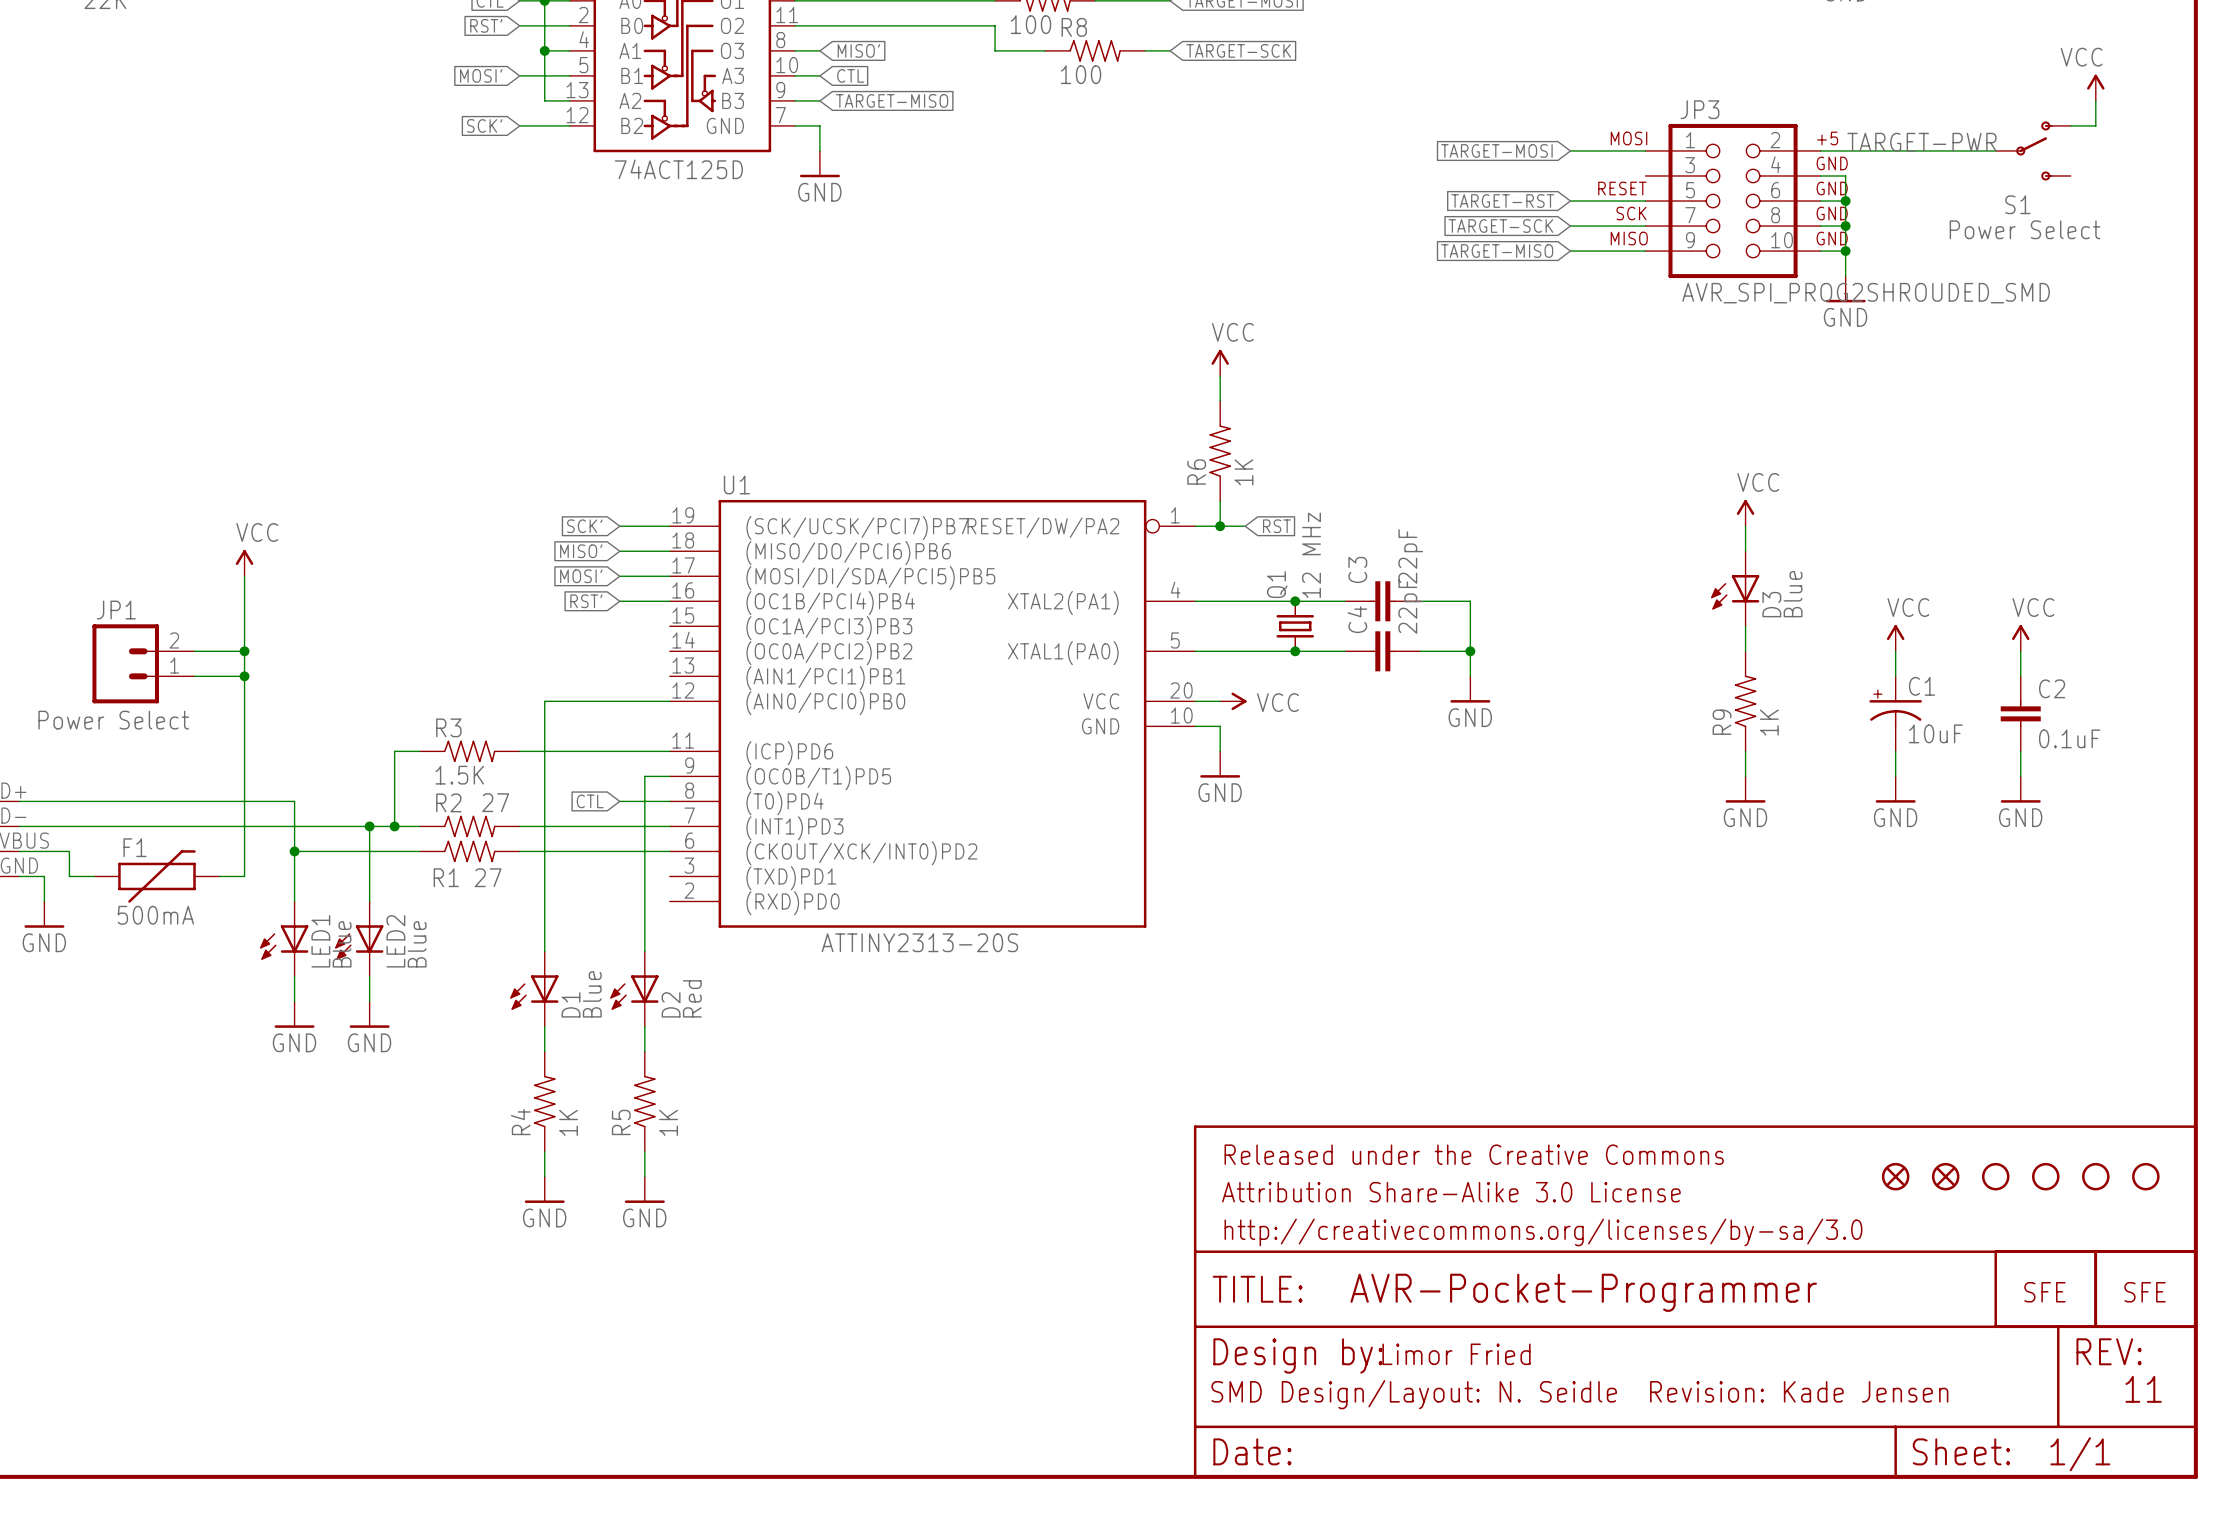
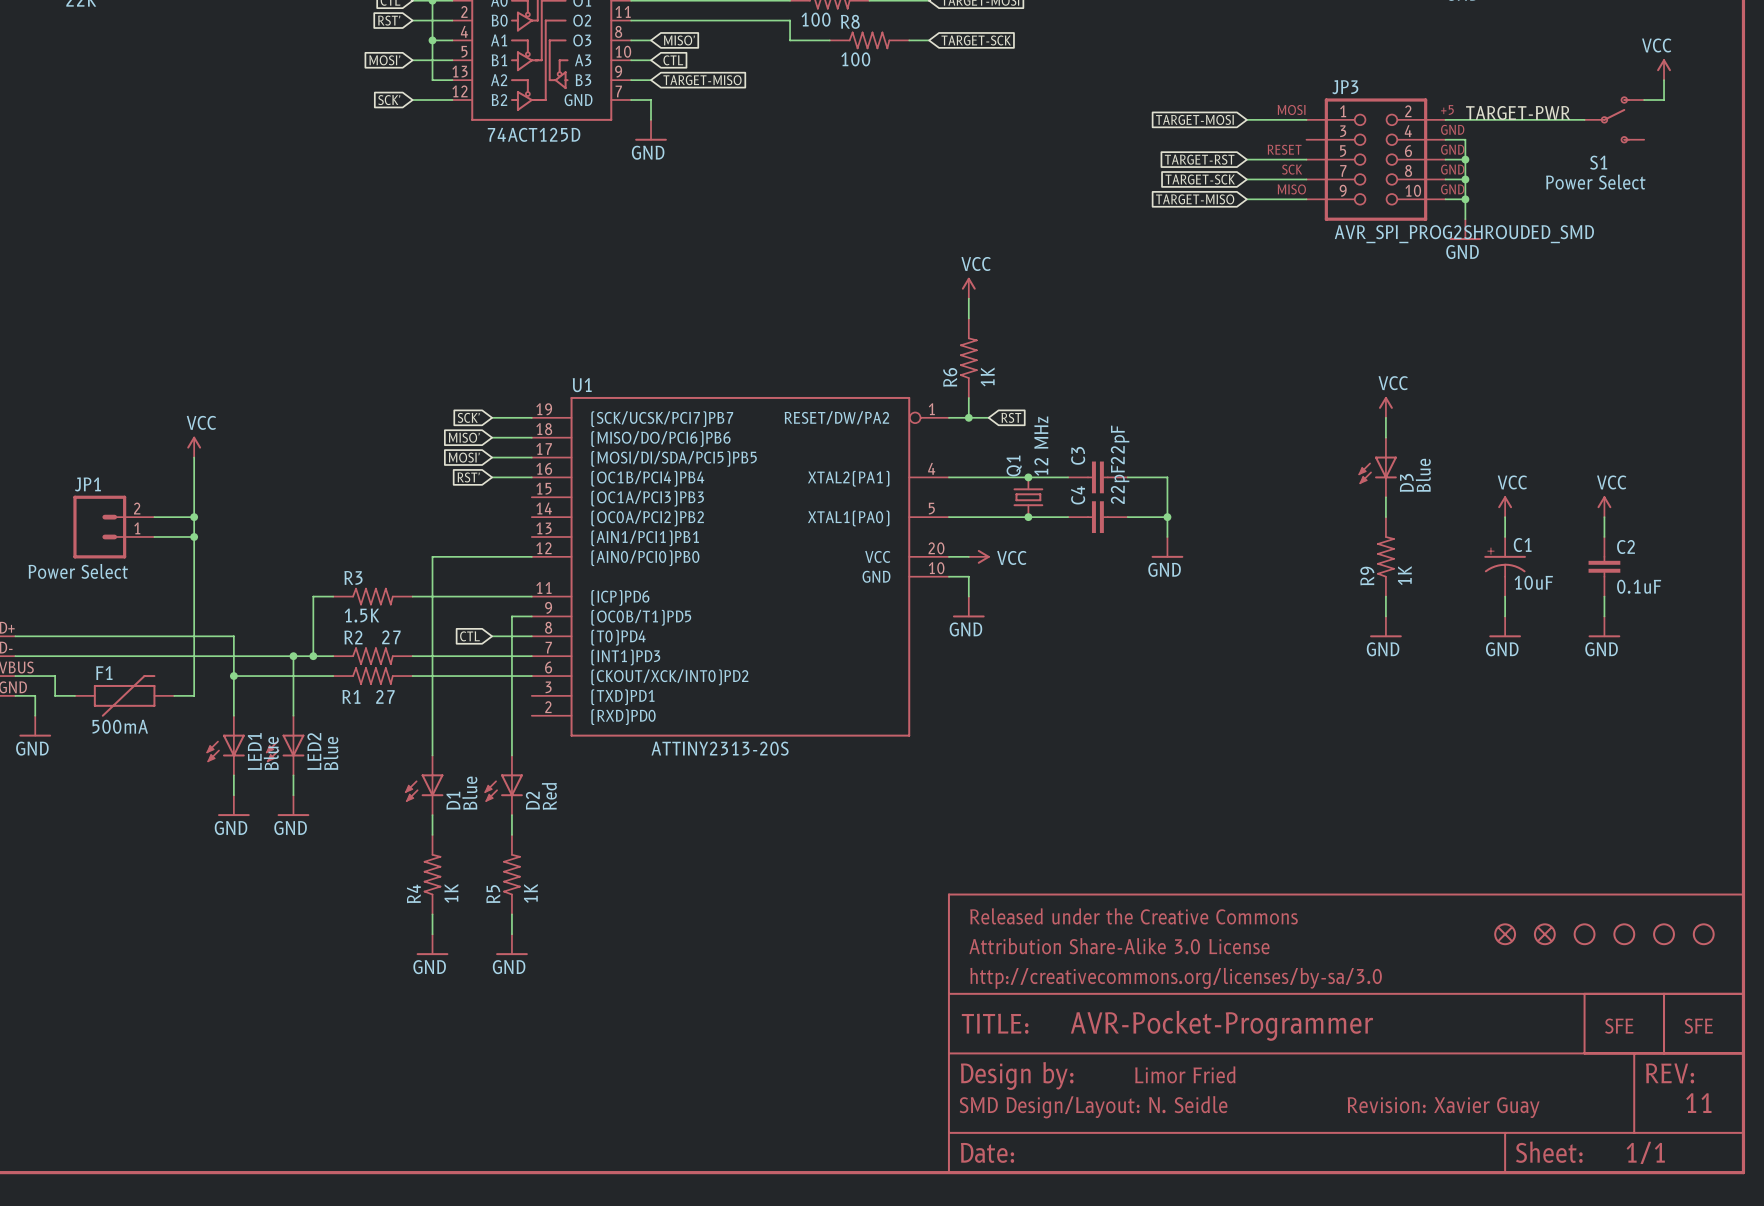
text position: Limor Fried (1456, 1354) -> Limor Fried (1185, 1074)
text: Revision: Kade Jensen (1799, 1391) -> Revision: Xavier Guay (1443, 1107)

